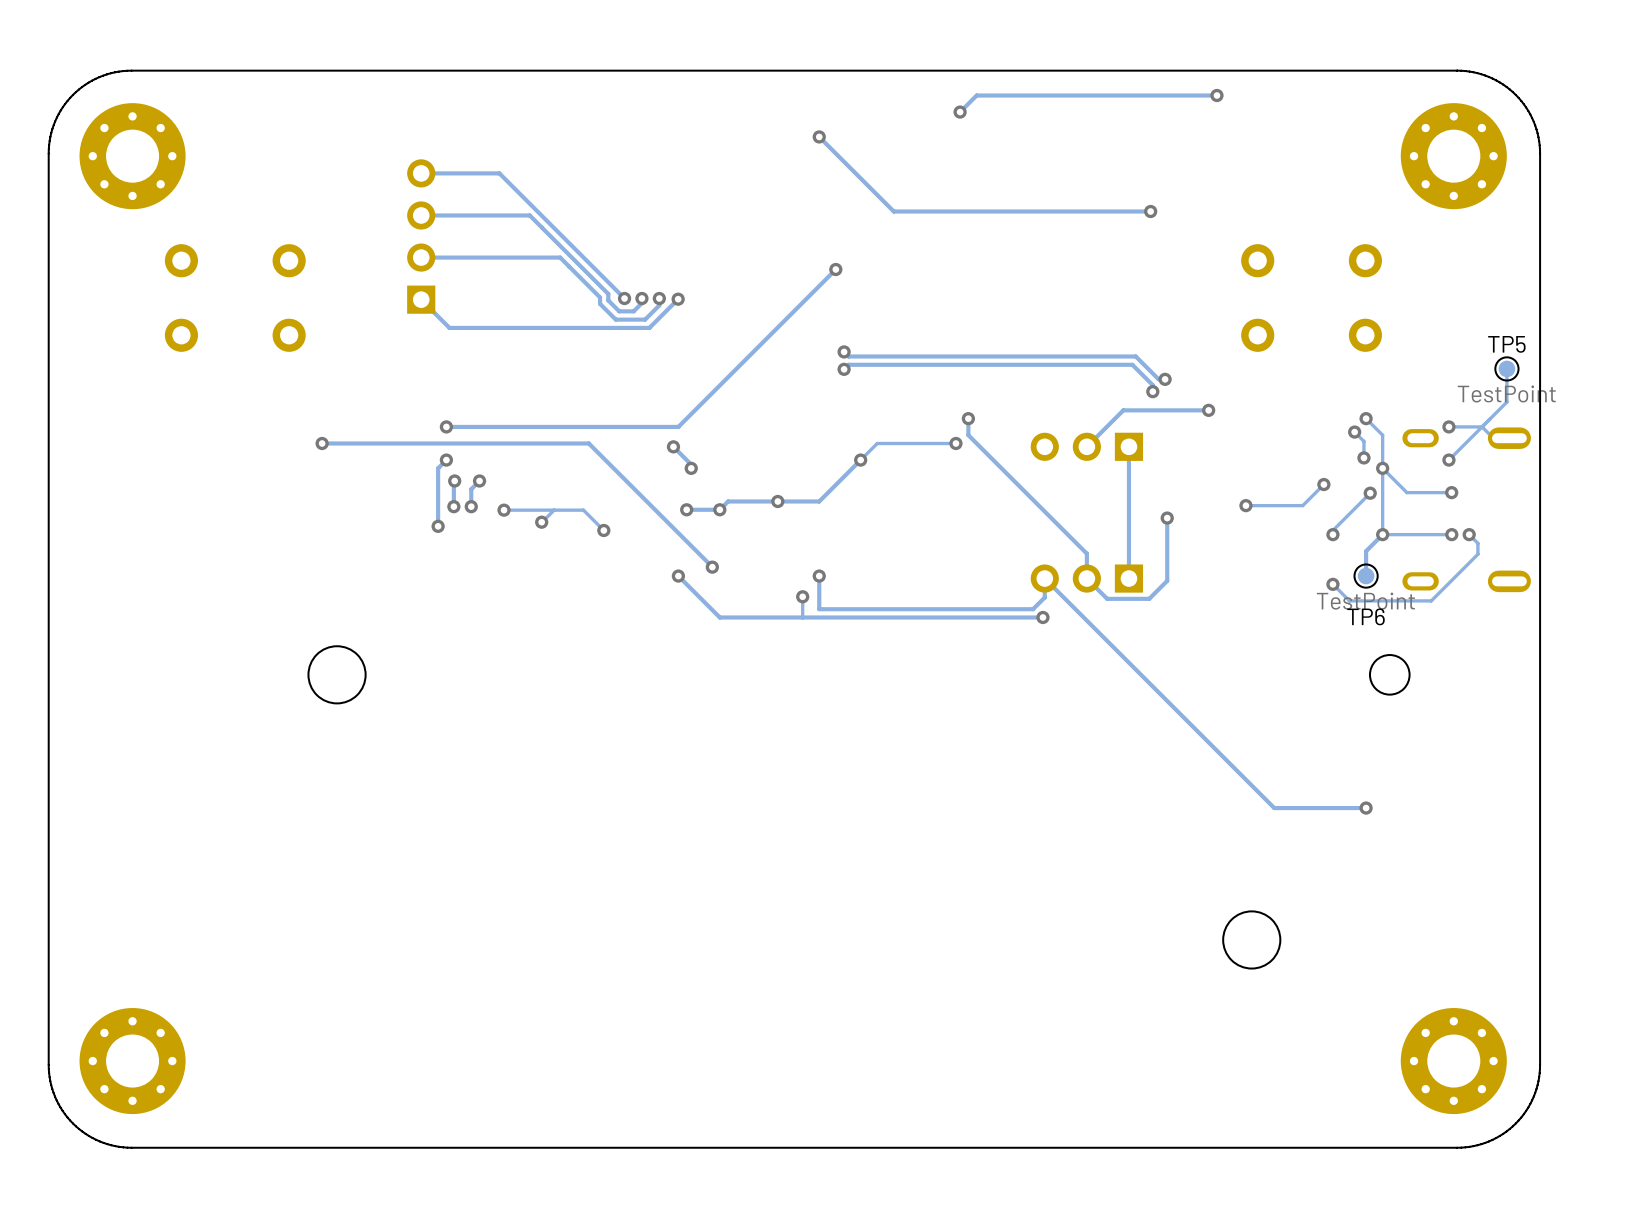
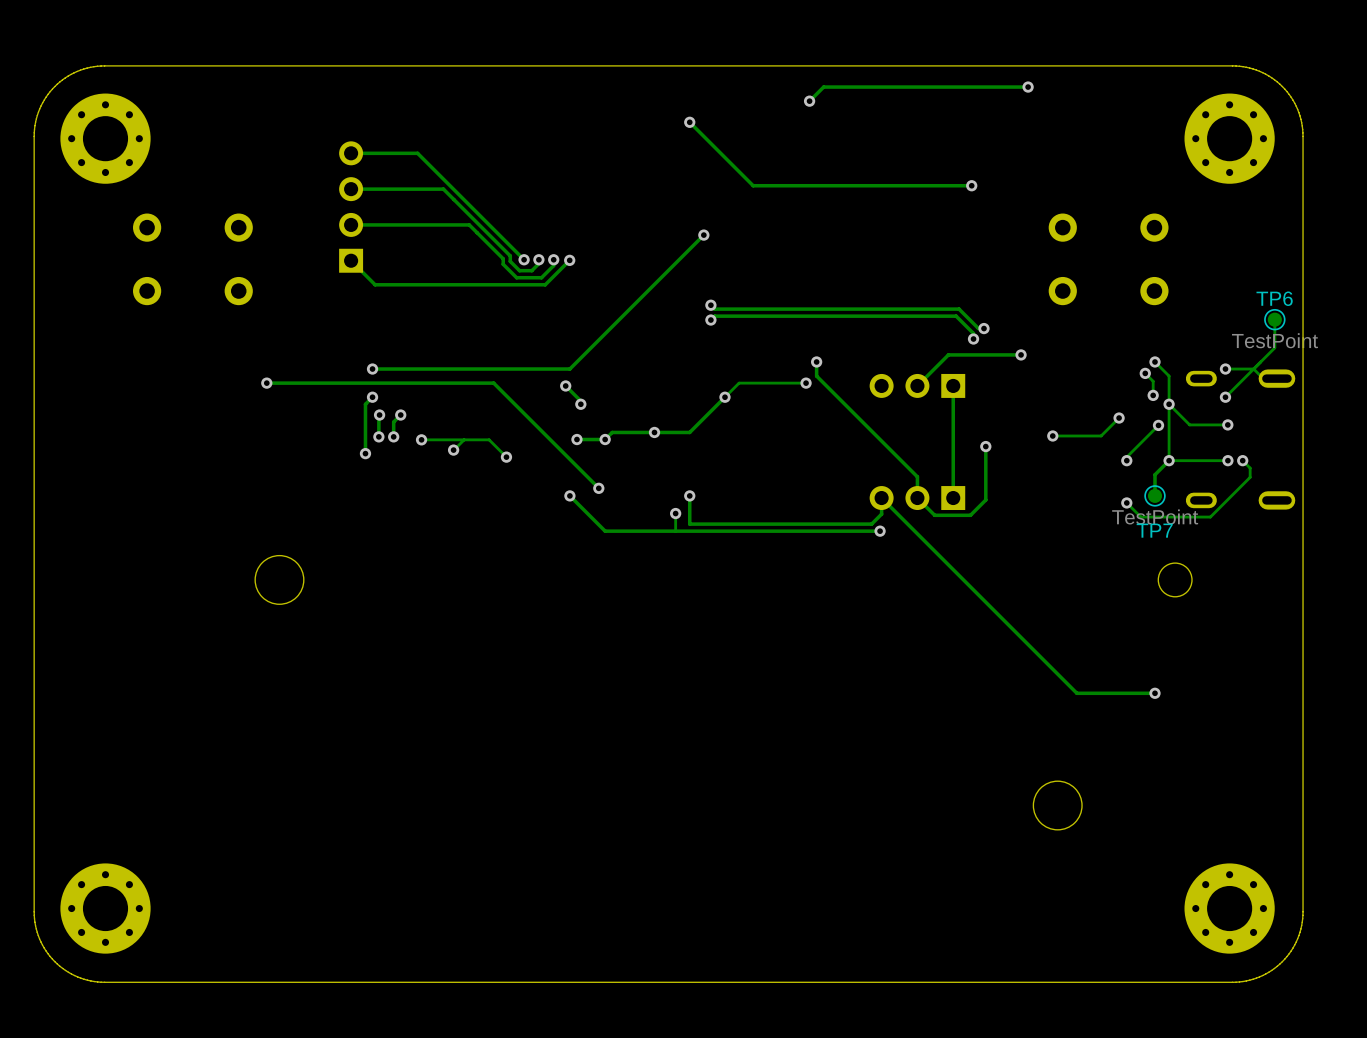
TP5 name: TP5 (1506, 344) -> TP6 (1274, 298)
TP6 name: TP6 (1366, 616) -> TP7 (1154, 530)

